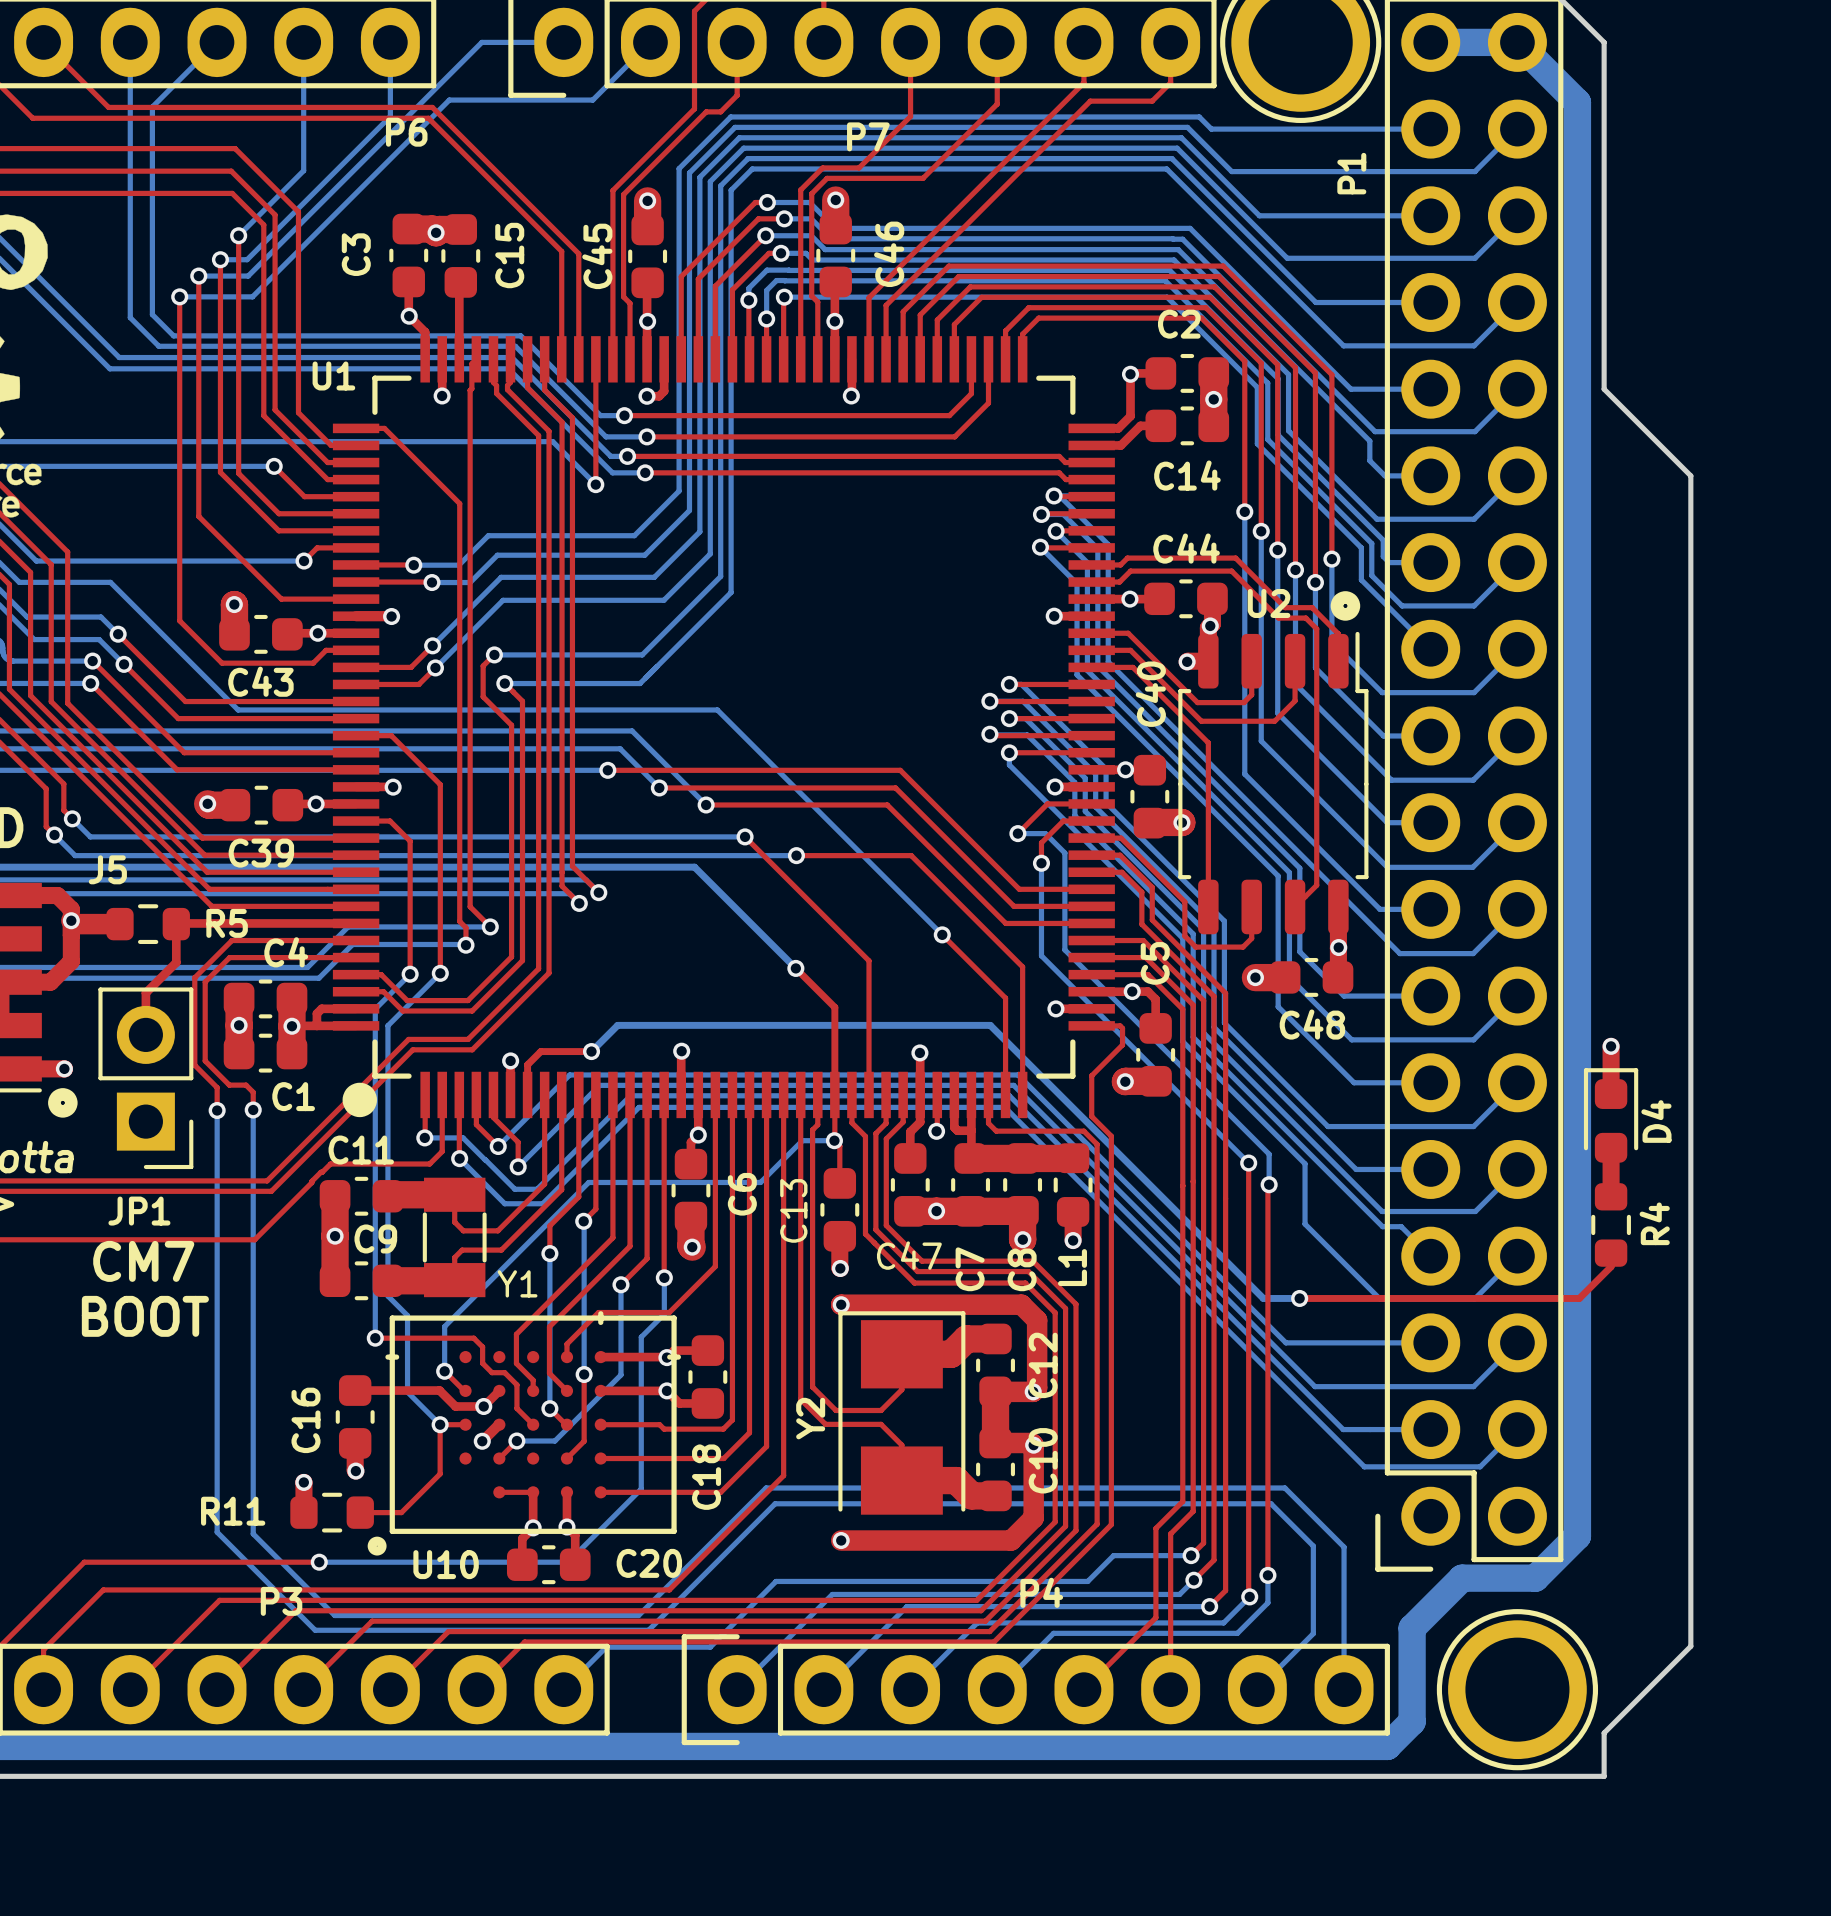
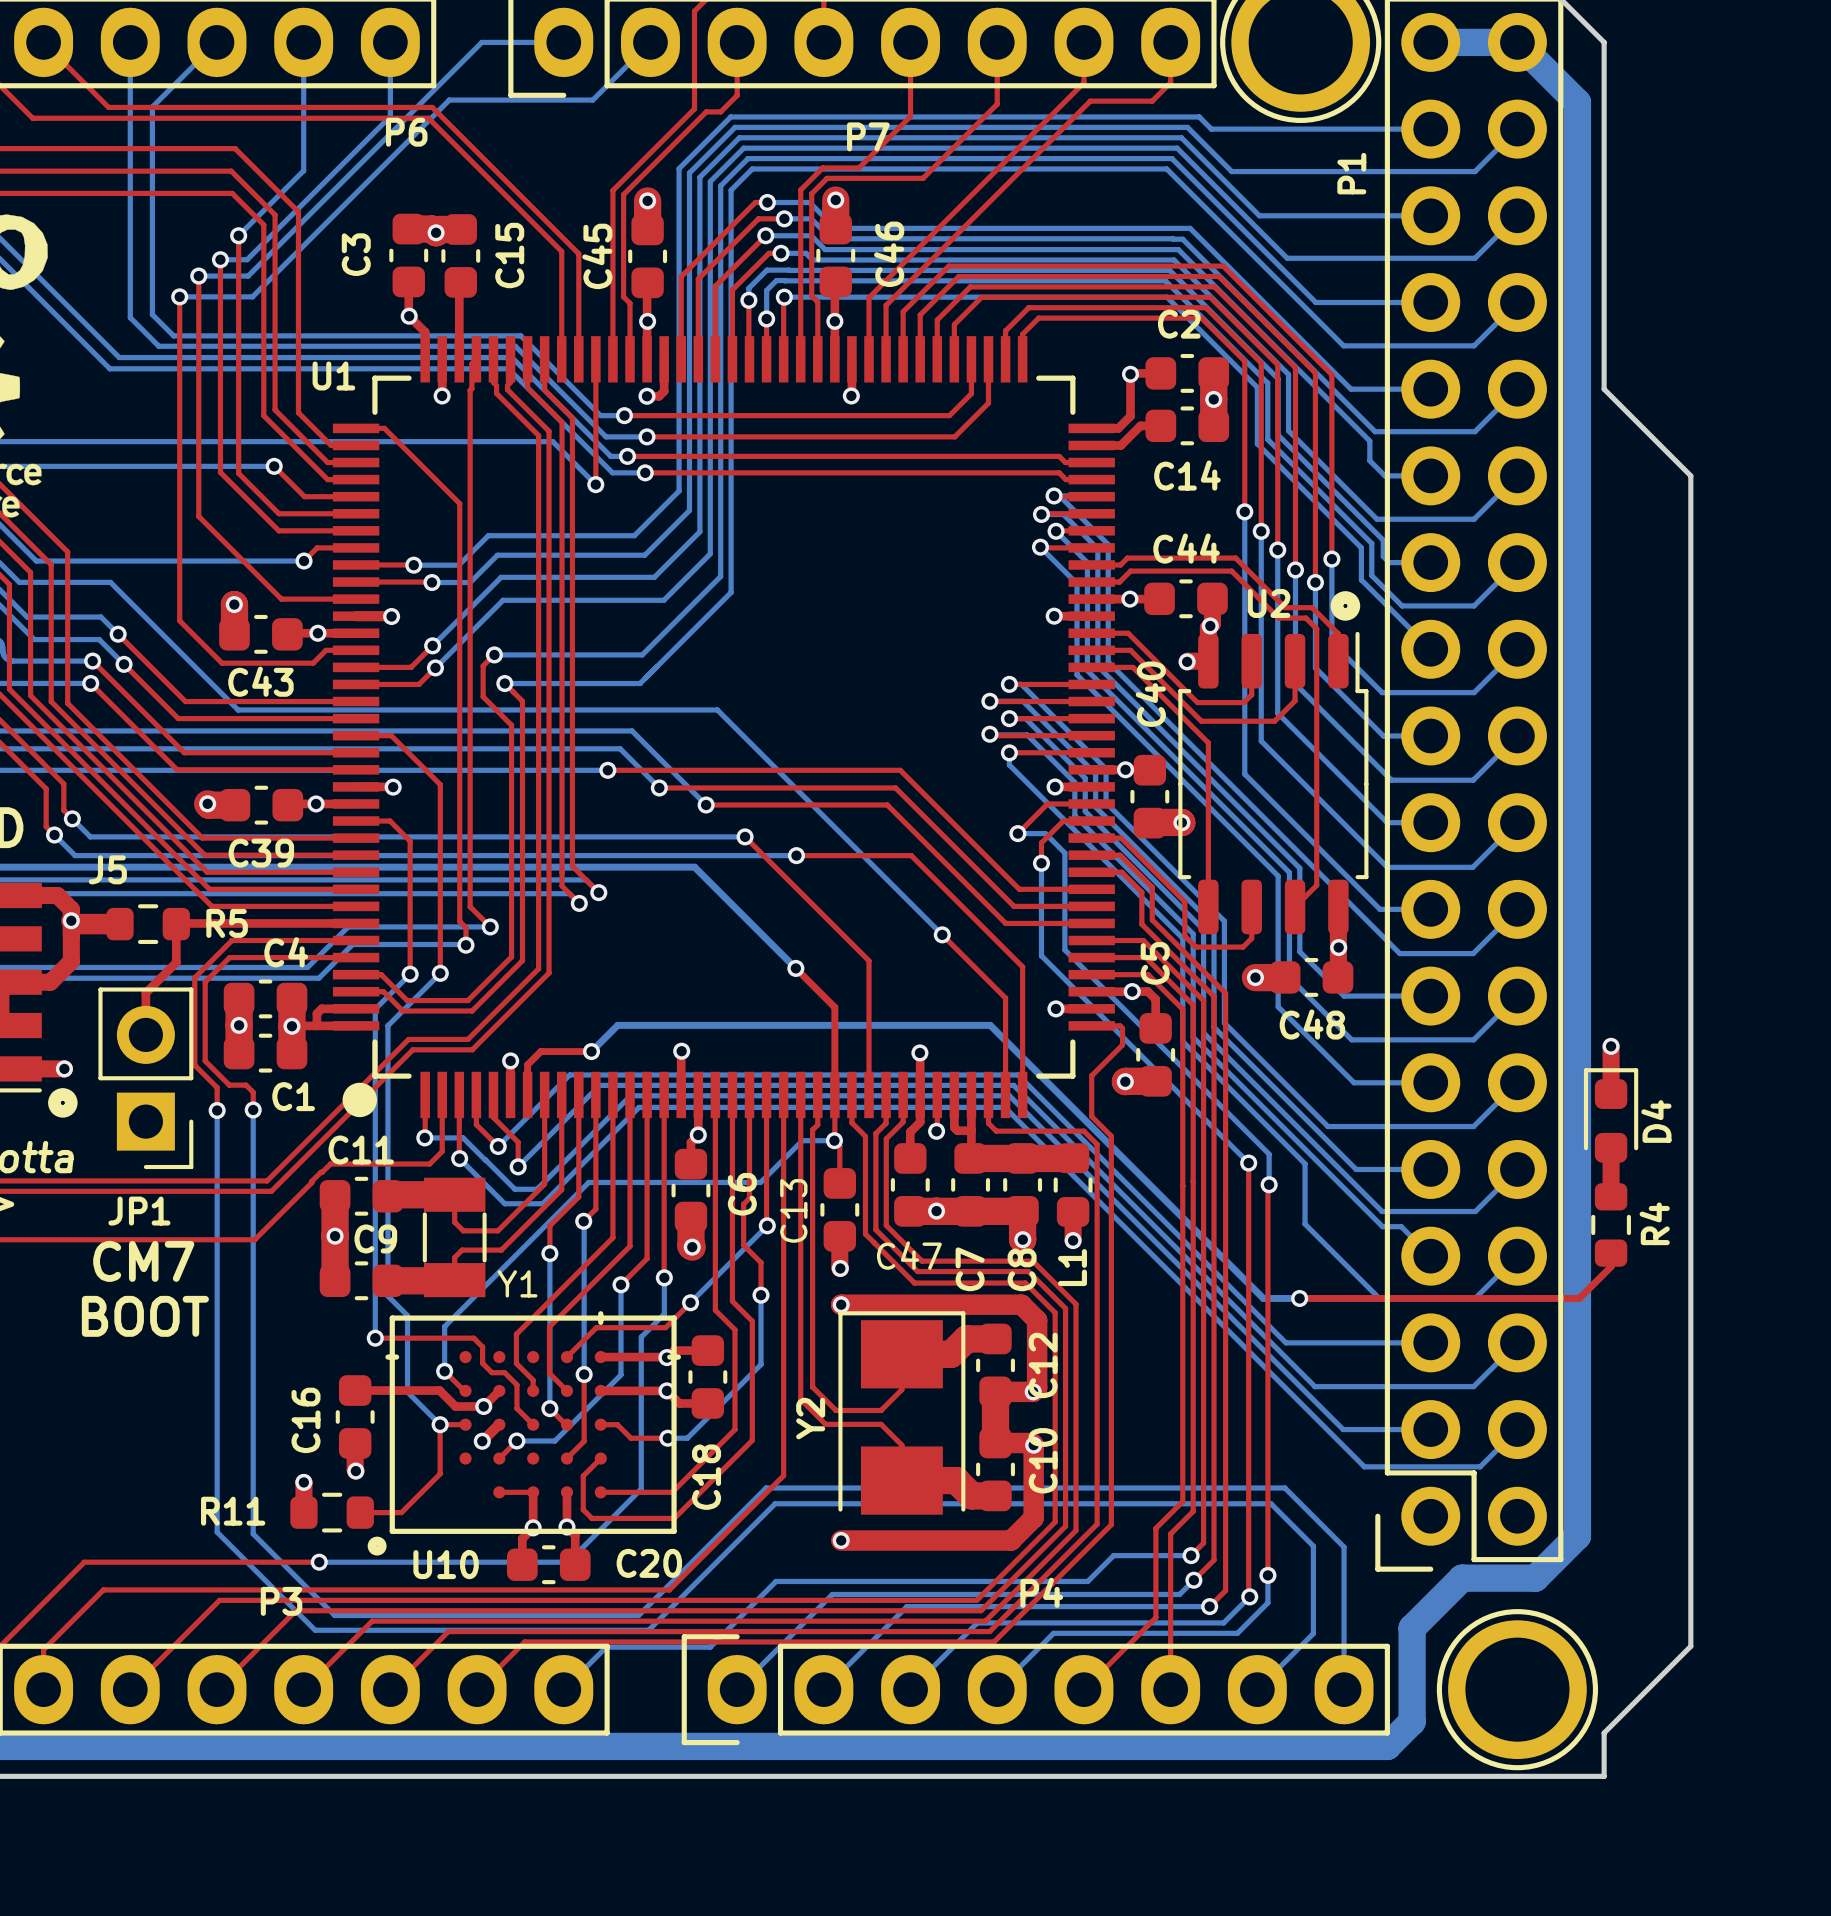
top track: (749, 1198) (749, 1432) (723, 1458) (600, 1458) -> (749, 1198) (743, 1204) (743, 1245) (761, 1262) (761, 1295)
top track: (766, 1225) (766, 1446) (720, 1492) (672, 1492) -> (715, 1266) (715, 1310) (735, 1329) (735, 1429) (672, 1492)
bottom track: none -> (767, 1225) (690, 1302)
via: none -> (767, 1225)
top track: (715, 1266) (669, 1312) (598, 1312) (566, 1344) (566, 1357) -> (690, 1302) (665, 1327) (596, 1327) (566, 1357)
bottom track: none -> (761, 1295) (761, 1364) (687, 1438) (667, 1438)
via: none -> (761, 1295)
top track: (732, 1301) (732, 1419) (723, 1429) (664, 1429) (659, 1424) (617, 1424) -> (732, 1301) (752, 1321) (752, 1440) (674, 1518) (591, 1518) (583, 1509) (583, 1476) (600, 1458)
via: none -> (690, 1302)
top track: none -> (617, 1424) (630, 1438) (667, 1438)
via: none -> (667, 1438)

